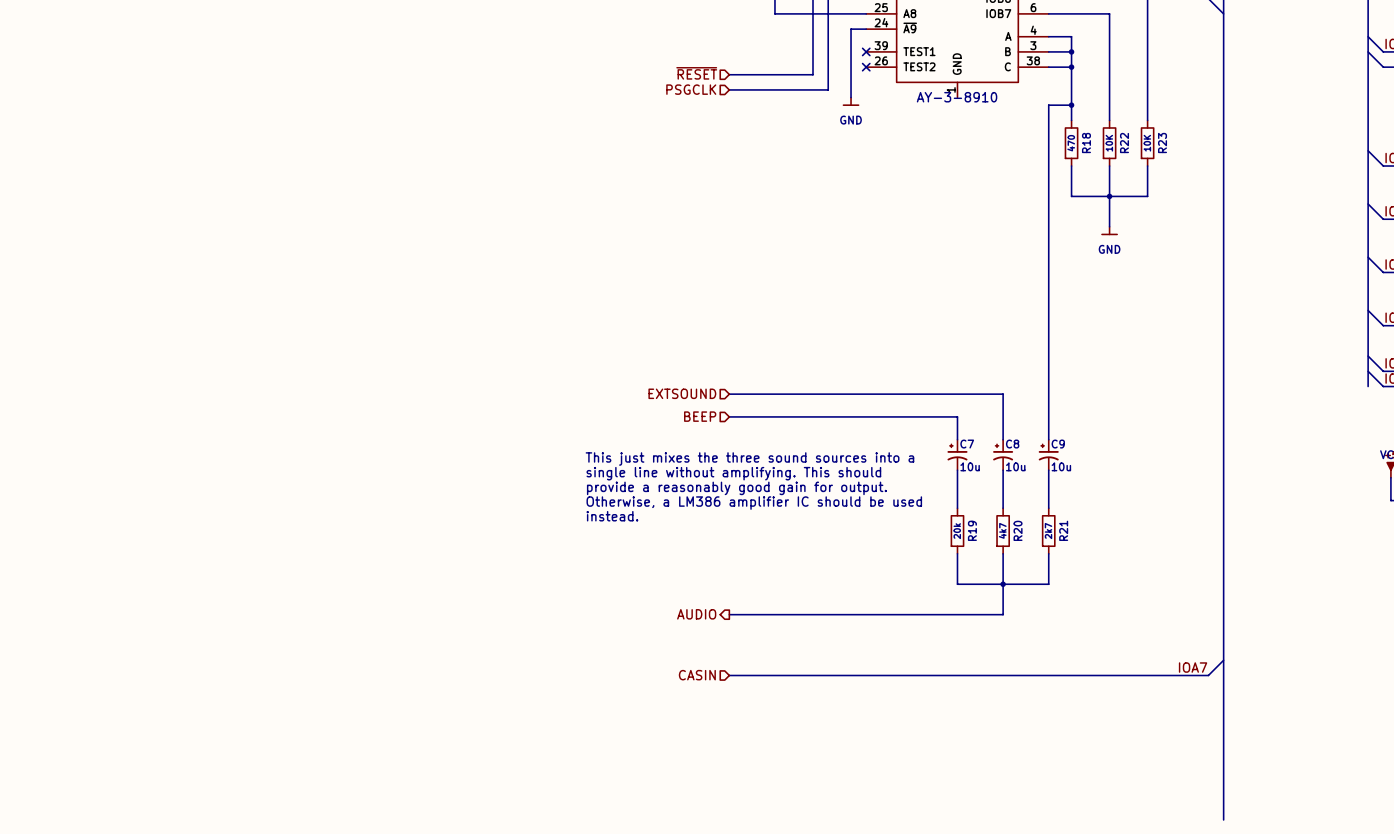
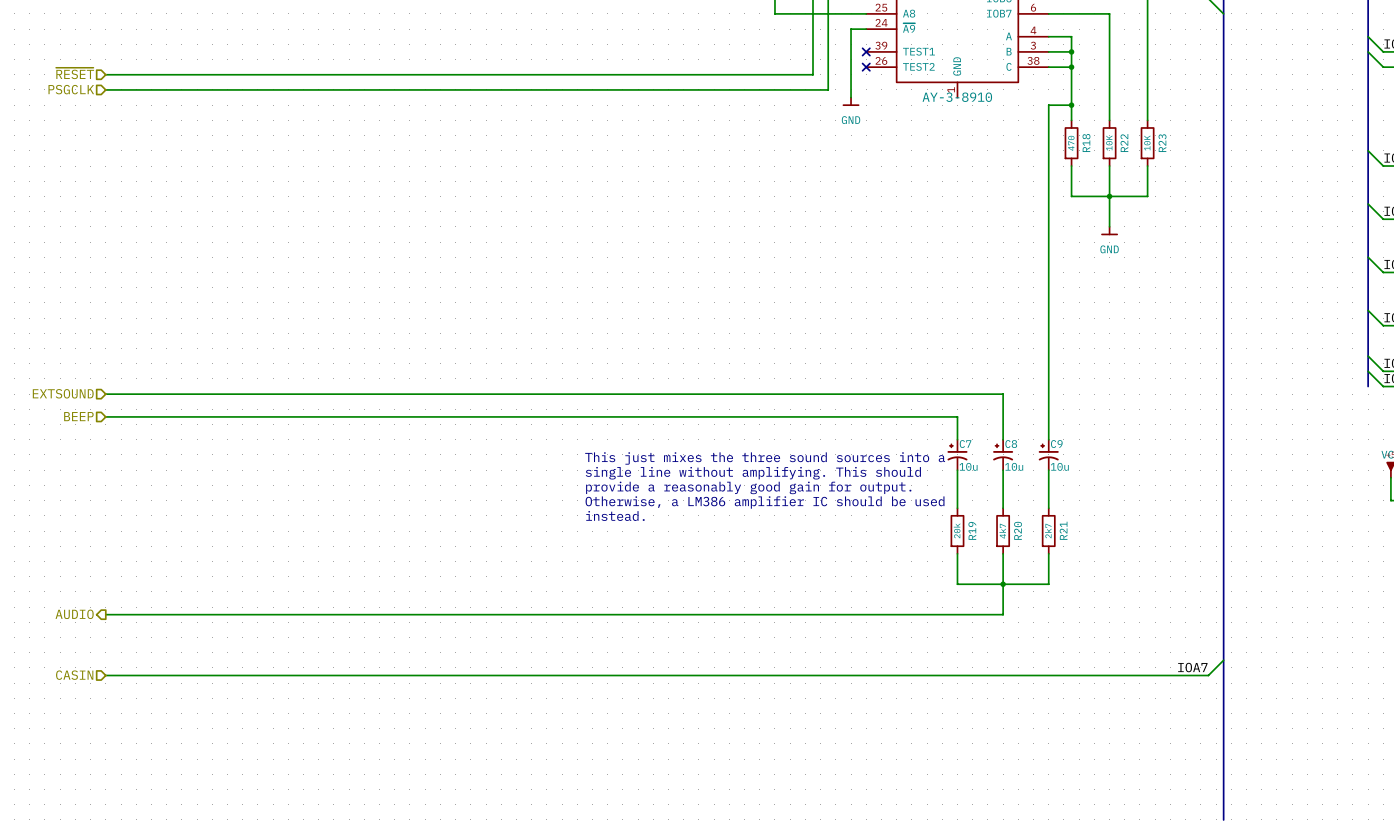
hierarchical label: none -> ~{RESET} (75, 73)
hierarchical label: ~{RESET} (696, 73) -> none
wire: none -> (105, 74) (729, 74)
hierarchical label: none -> PSGCLK (71, 89)
wire: none -> (105, 89) (729, 89)
hierarchical label: PSGCLK (691, 89) -> none
hierarchical label: none -> EXTSOUND (63, 393)
hierarchical label: EXTSOUND (682, 393) -> none
wire: none -> (105, 394) (729, 394)
hierarchical label: none -> BEEP (78, 416)
wire: none -> (105, 416) (729, 416)
hierarchical label: BEEP (700, 416) -> none
hierarchical label: none -> AUDIO (74, 614)
wire: none -> (105, 614) (729, 614)
hierarchical label: AUDIO (696, 614) -> none
hierarchical label: none -> CASIN (74, 675)
wire: none -> (105, 675) (729, 675)
hierarchical label: CASIN (697, 675) -> none

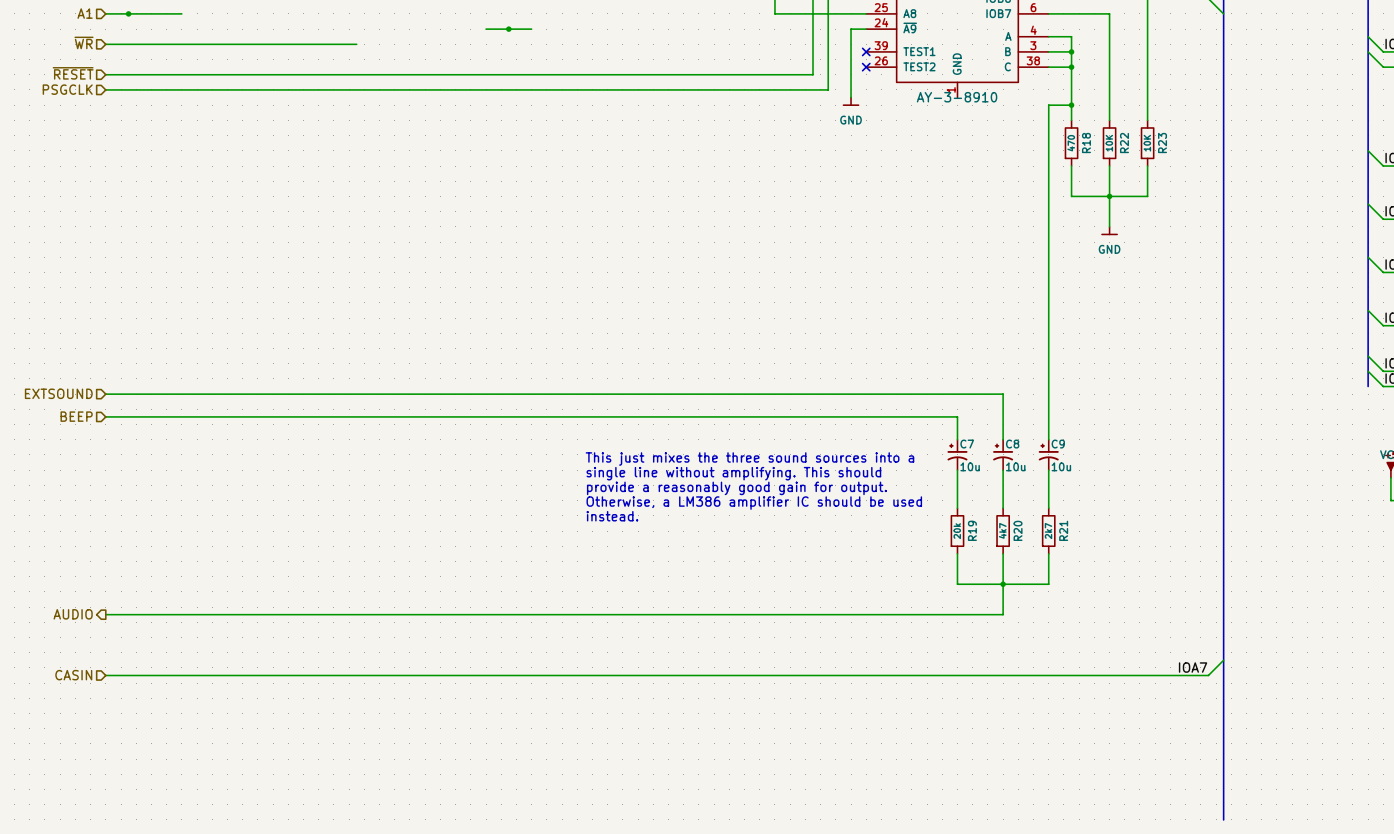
hierarchical label: none -> A1 (85, 13)
wire: none -> (105, 13) (181, 13)
junction: none -> (128, 13)
wire: none -> (486, 29) (531, 29)
junction: none -> (508, 29)
hierarchical label: none -> ~{WR} (84, 42)
wire: none -> (105, 44) (356, 44)

